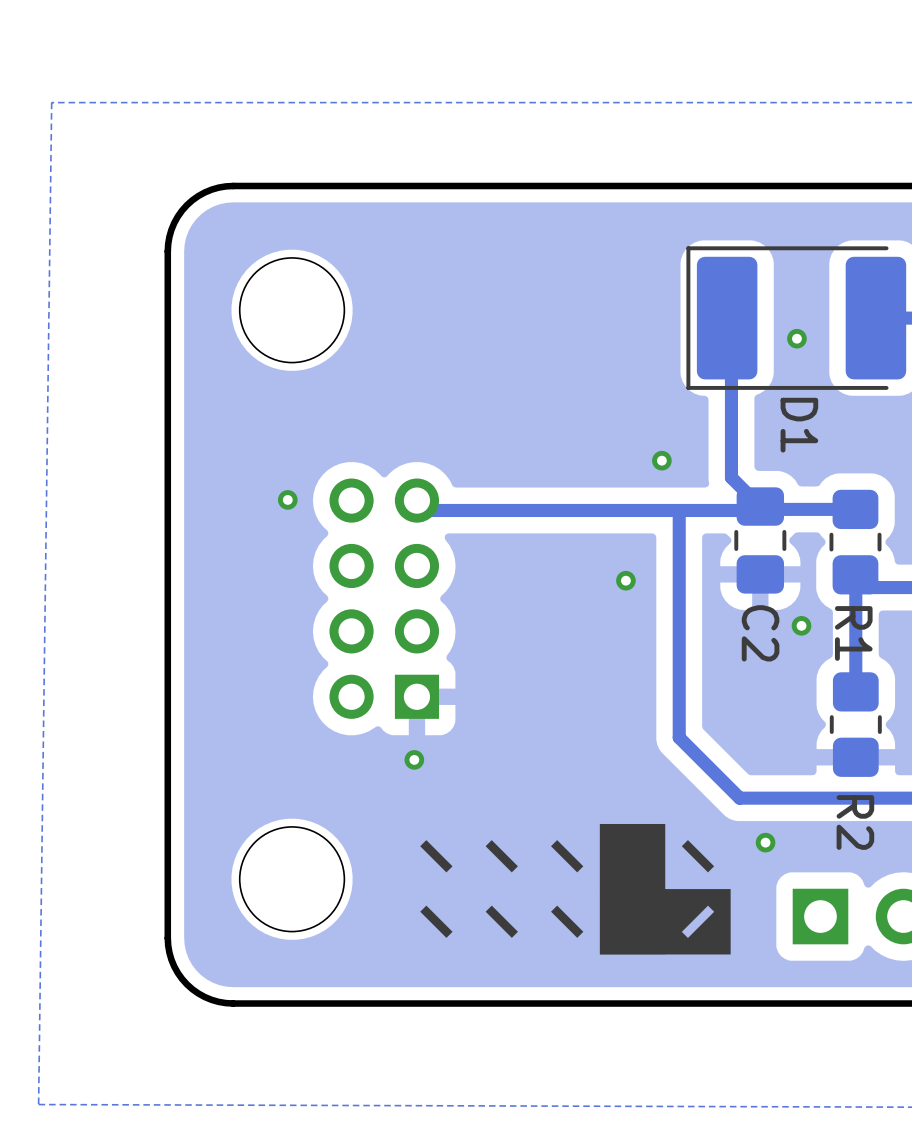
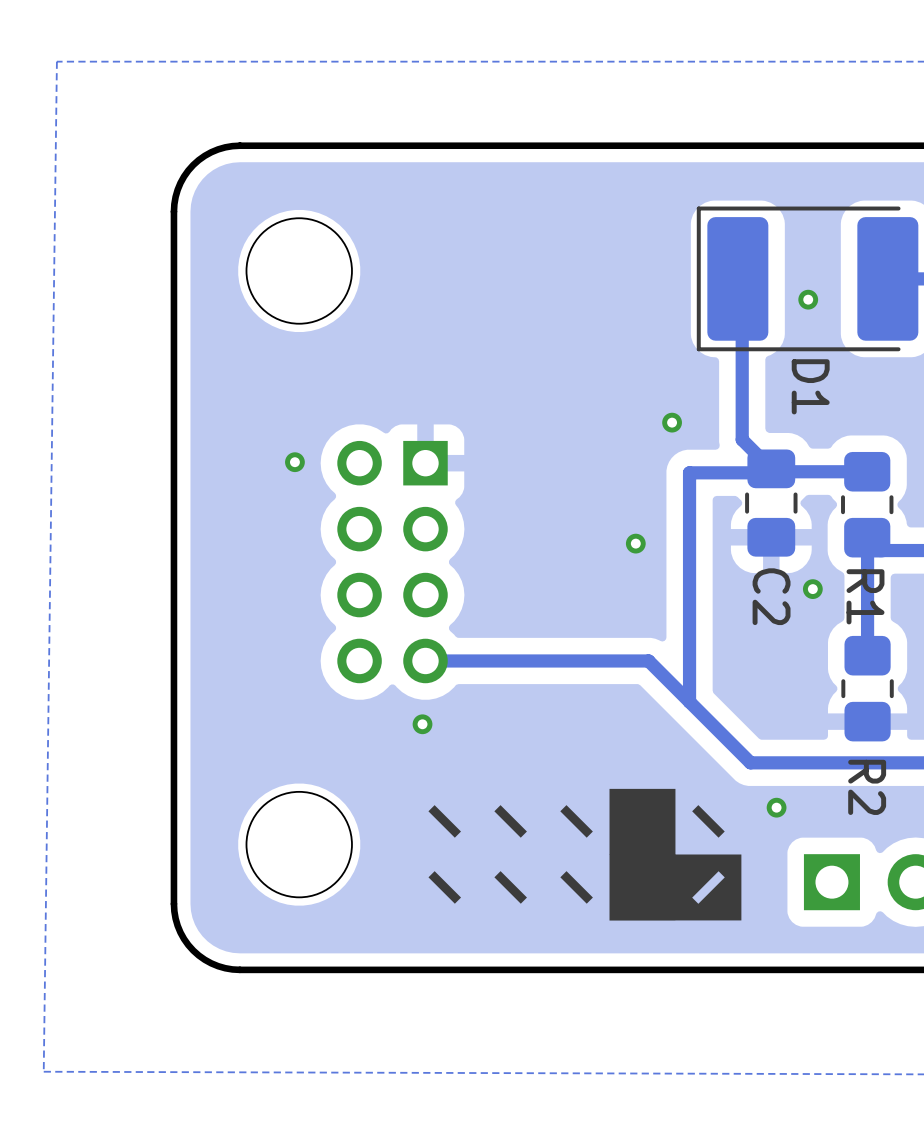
track: (679, 510) (426, 510) -> none
part side: top (384, 598) -> bottom (392, 562)
track: none -> (425, 660) (648, 660) (689, 701)

